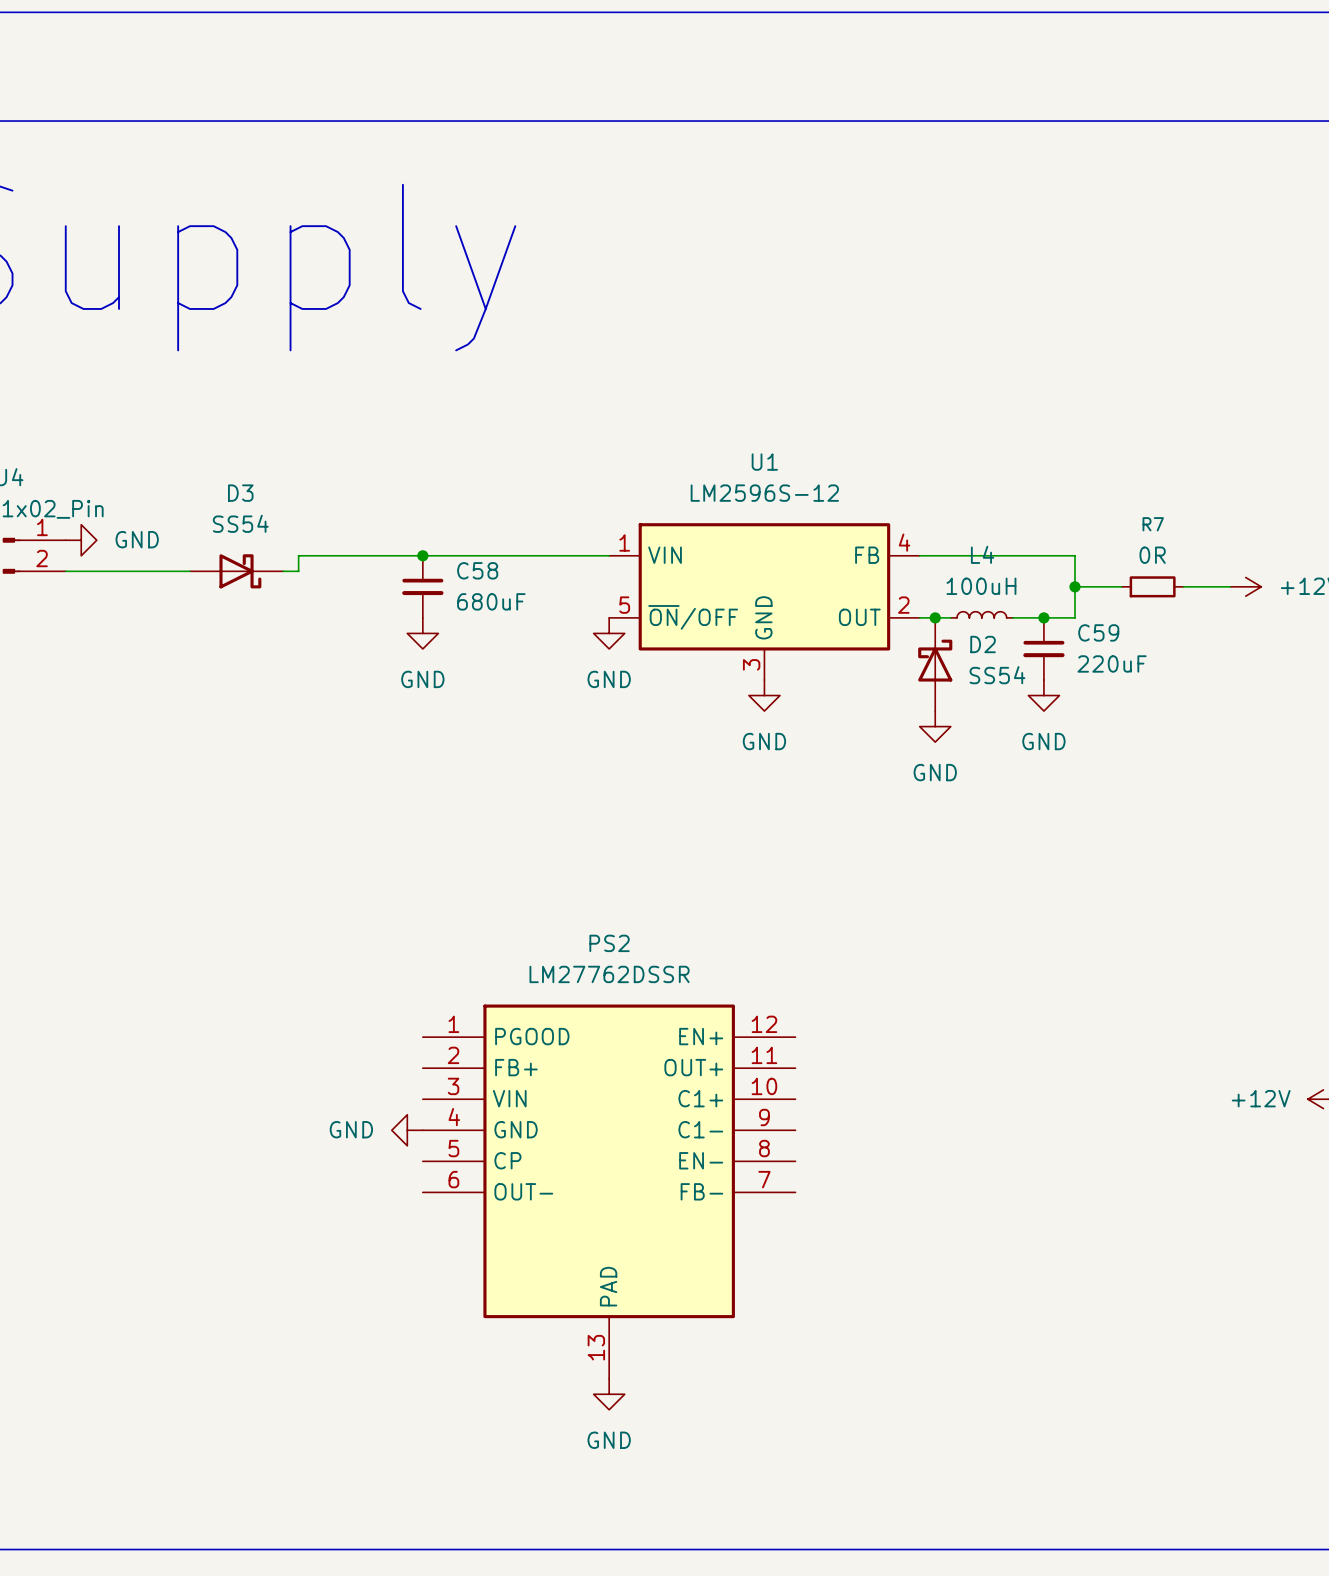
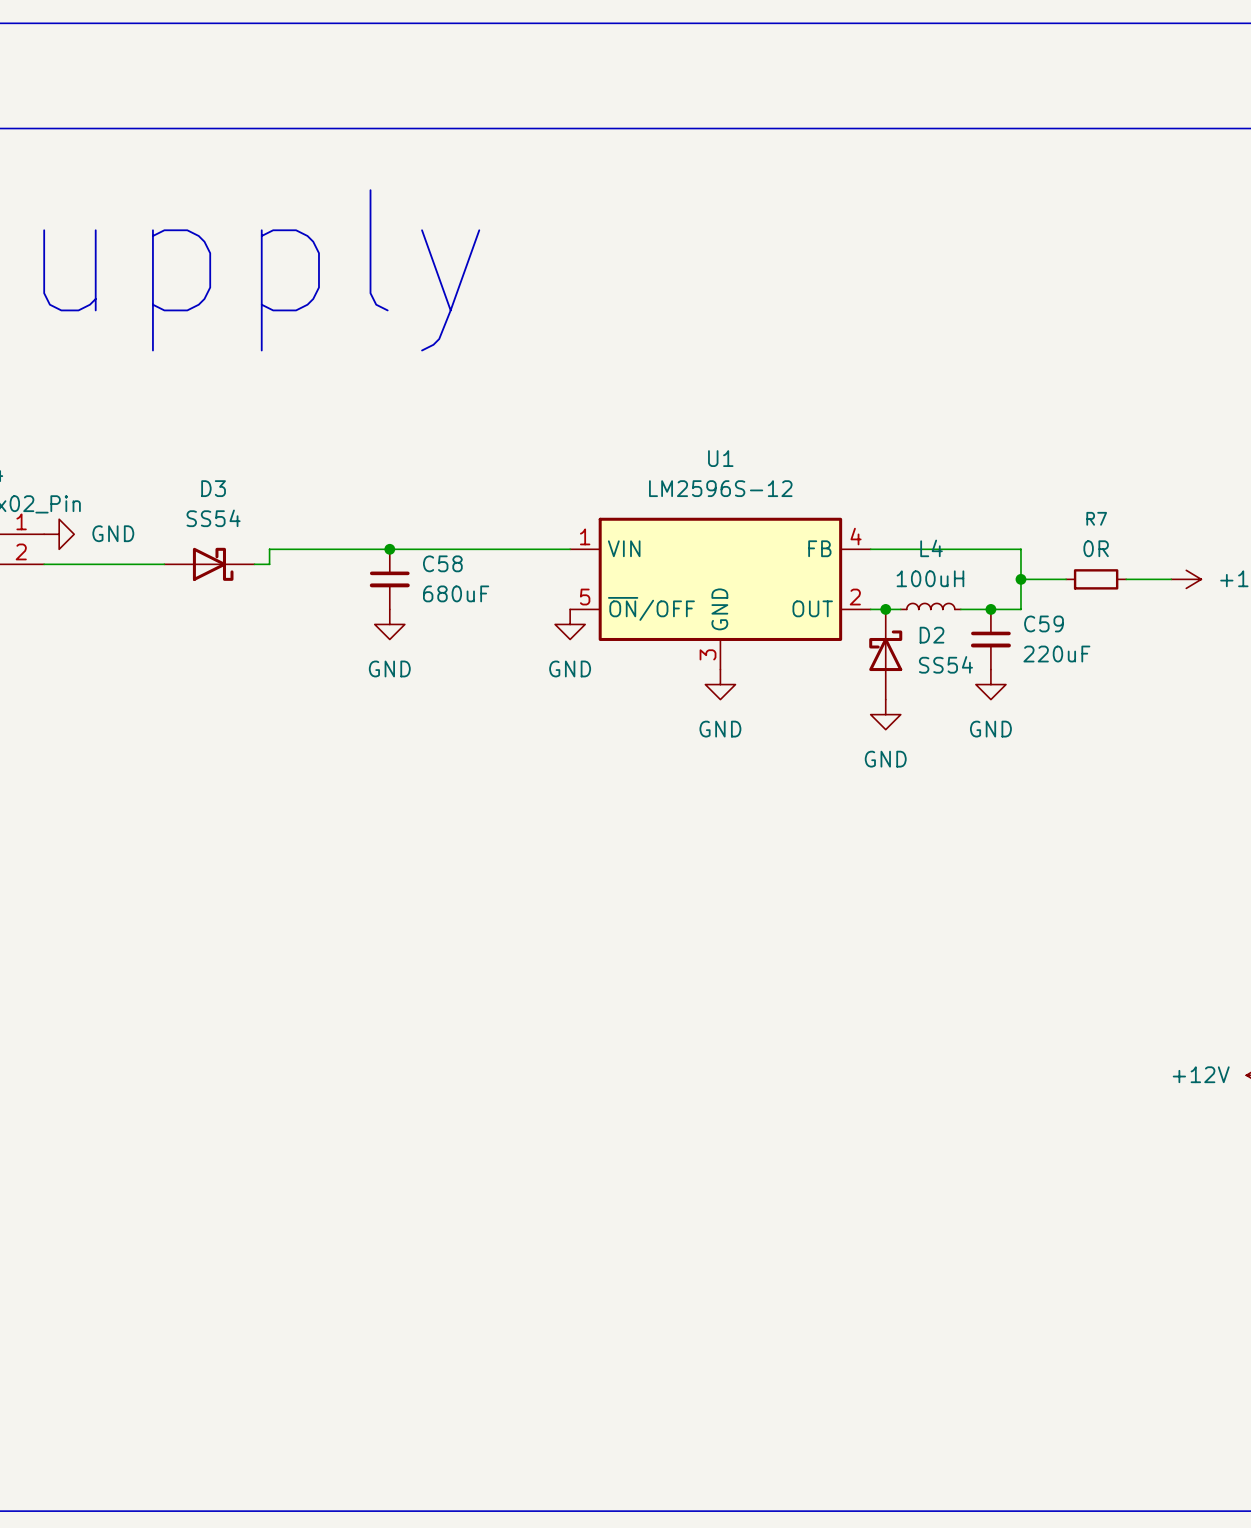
power symbol: GND (407, 1130) -> none
PS2: LM27762DSSR (609, 1191) -> none
power symbol: GND (609, 1394) -> none

